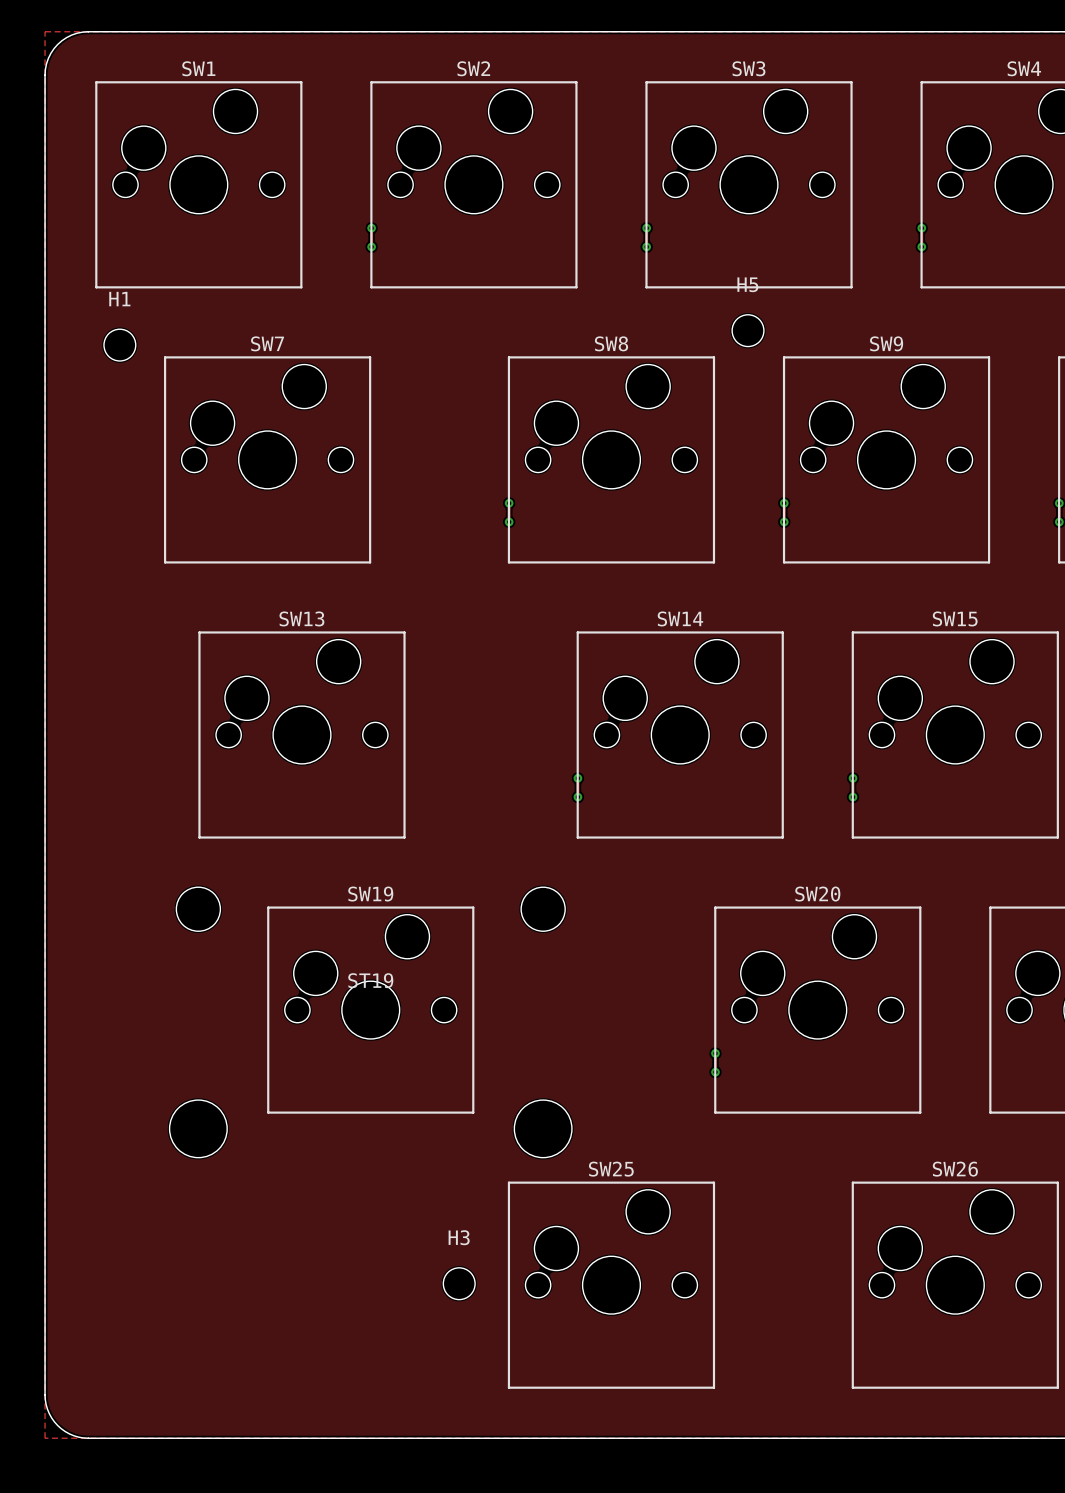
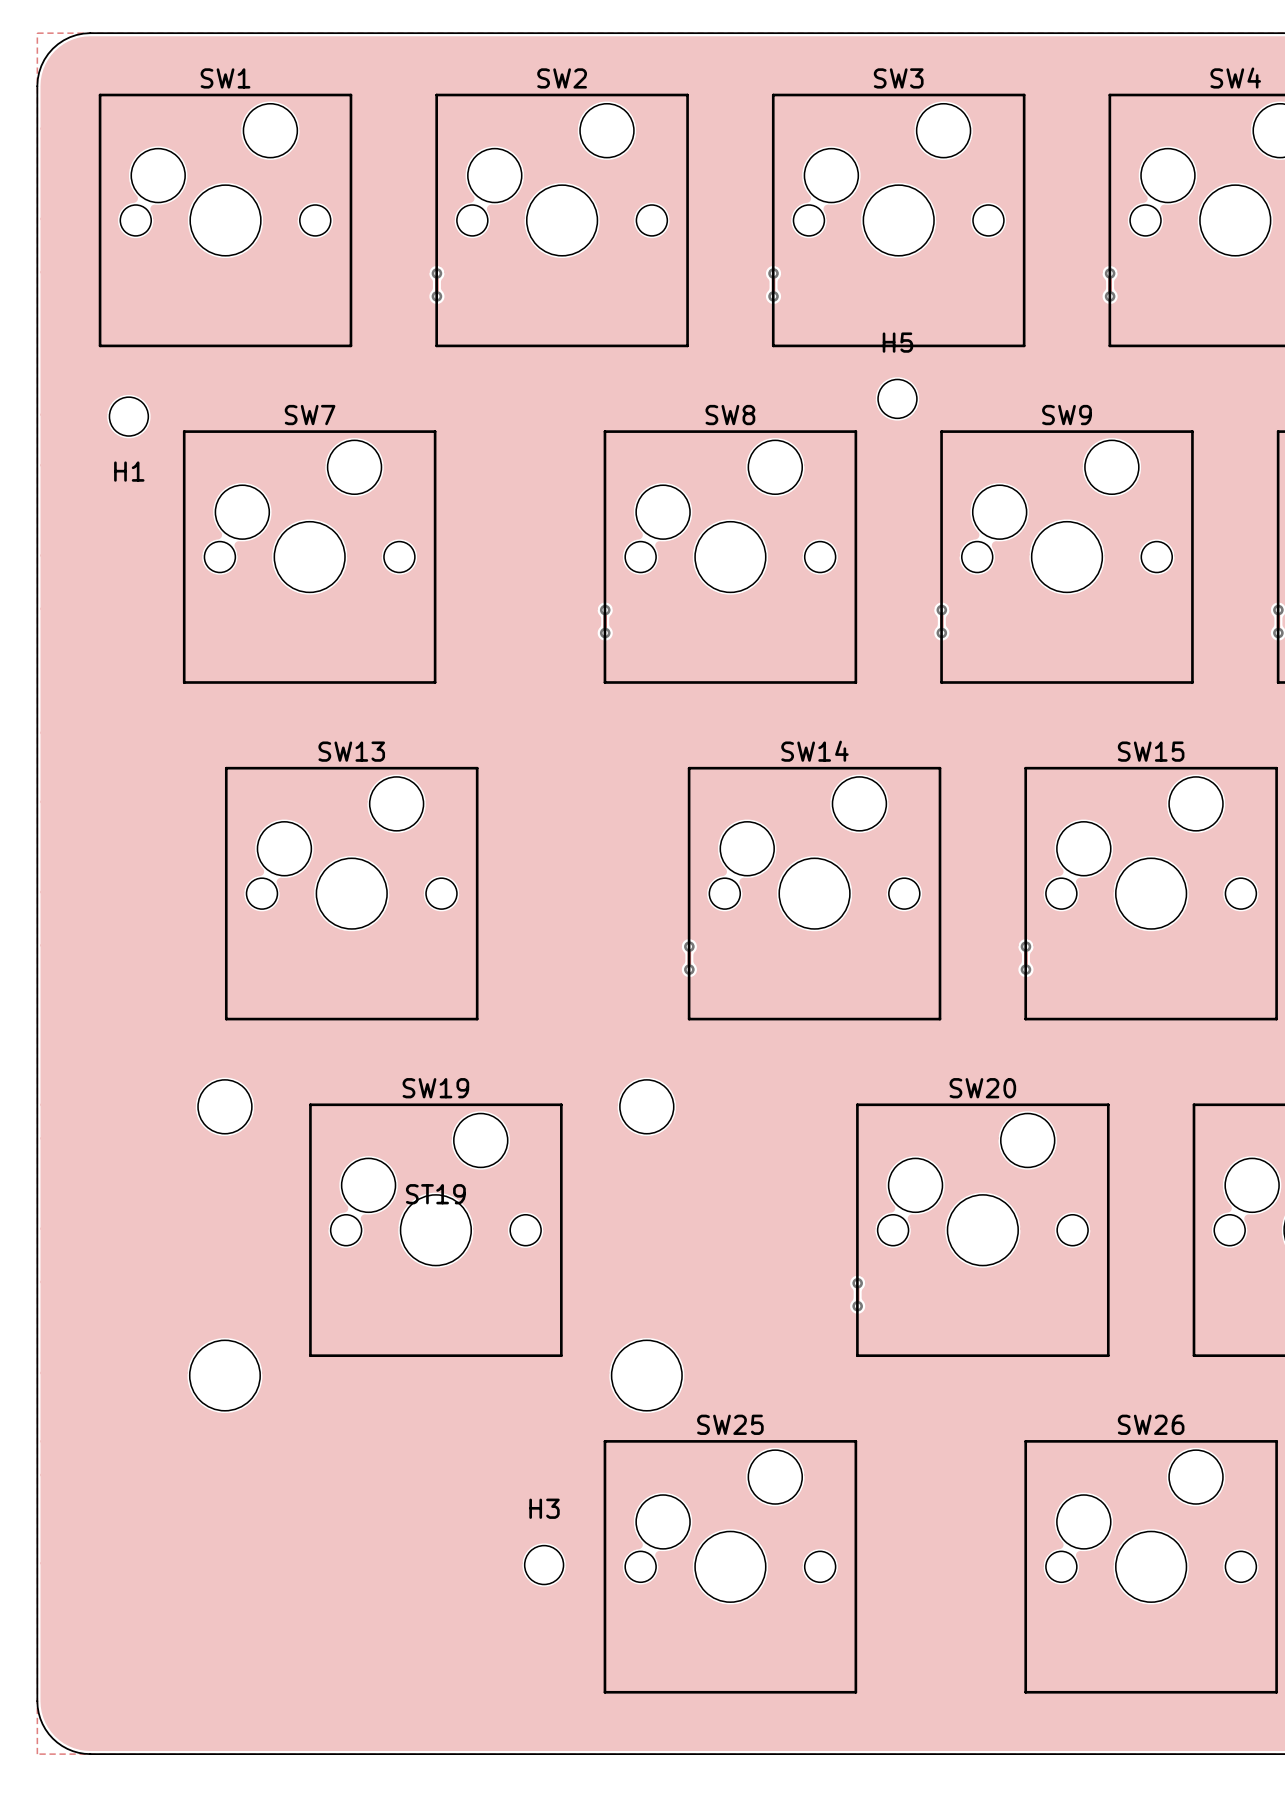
H1 name position: H1 (119, 299) -> H1 (129, 471)

